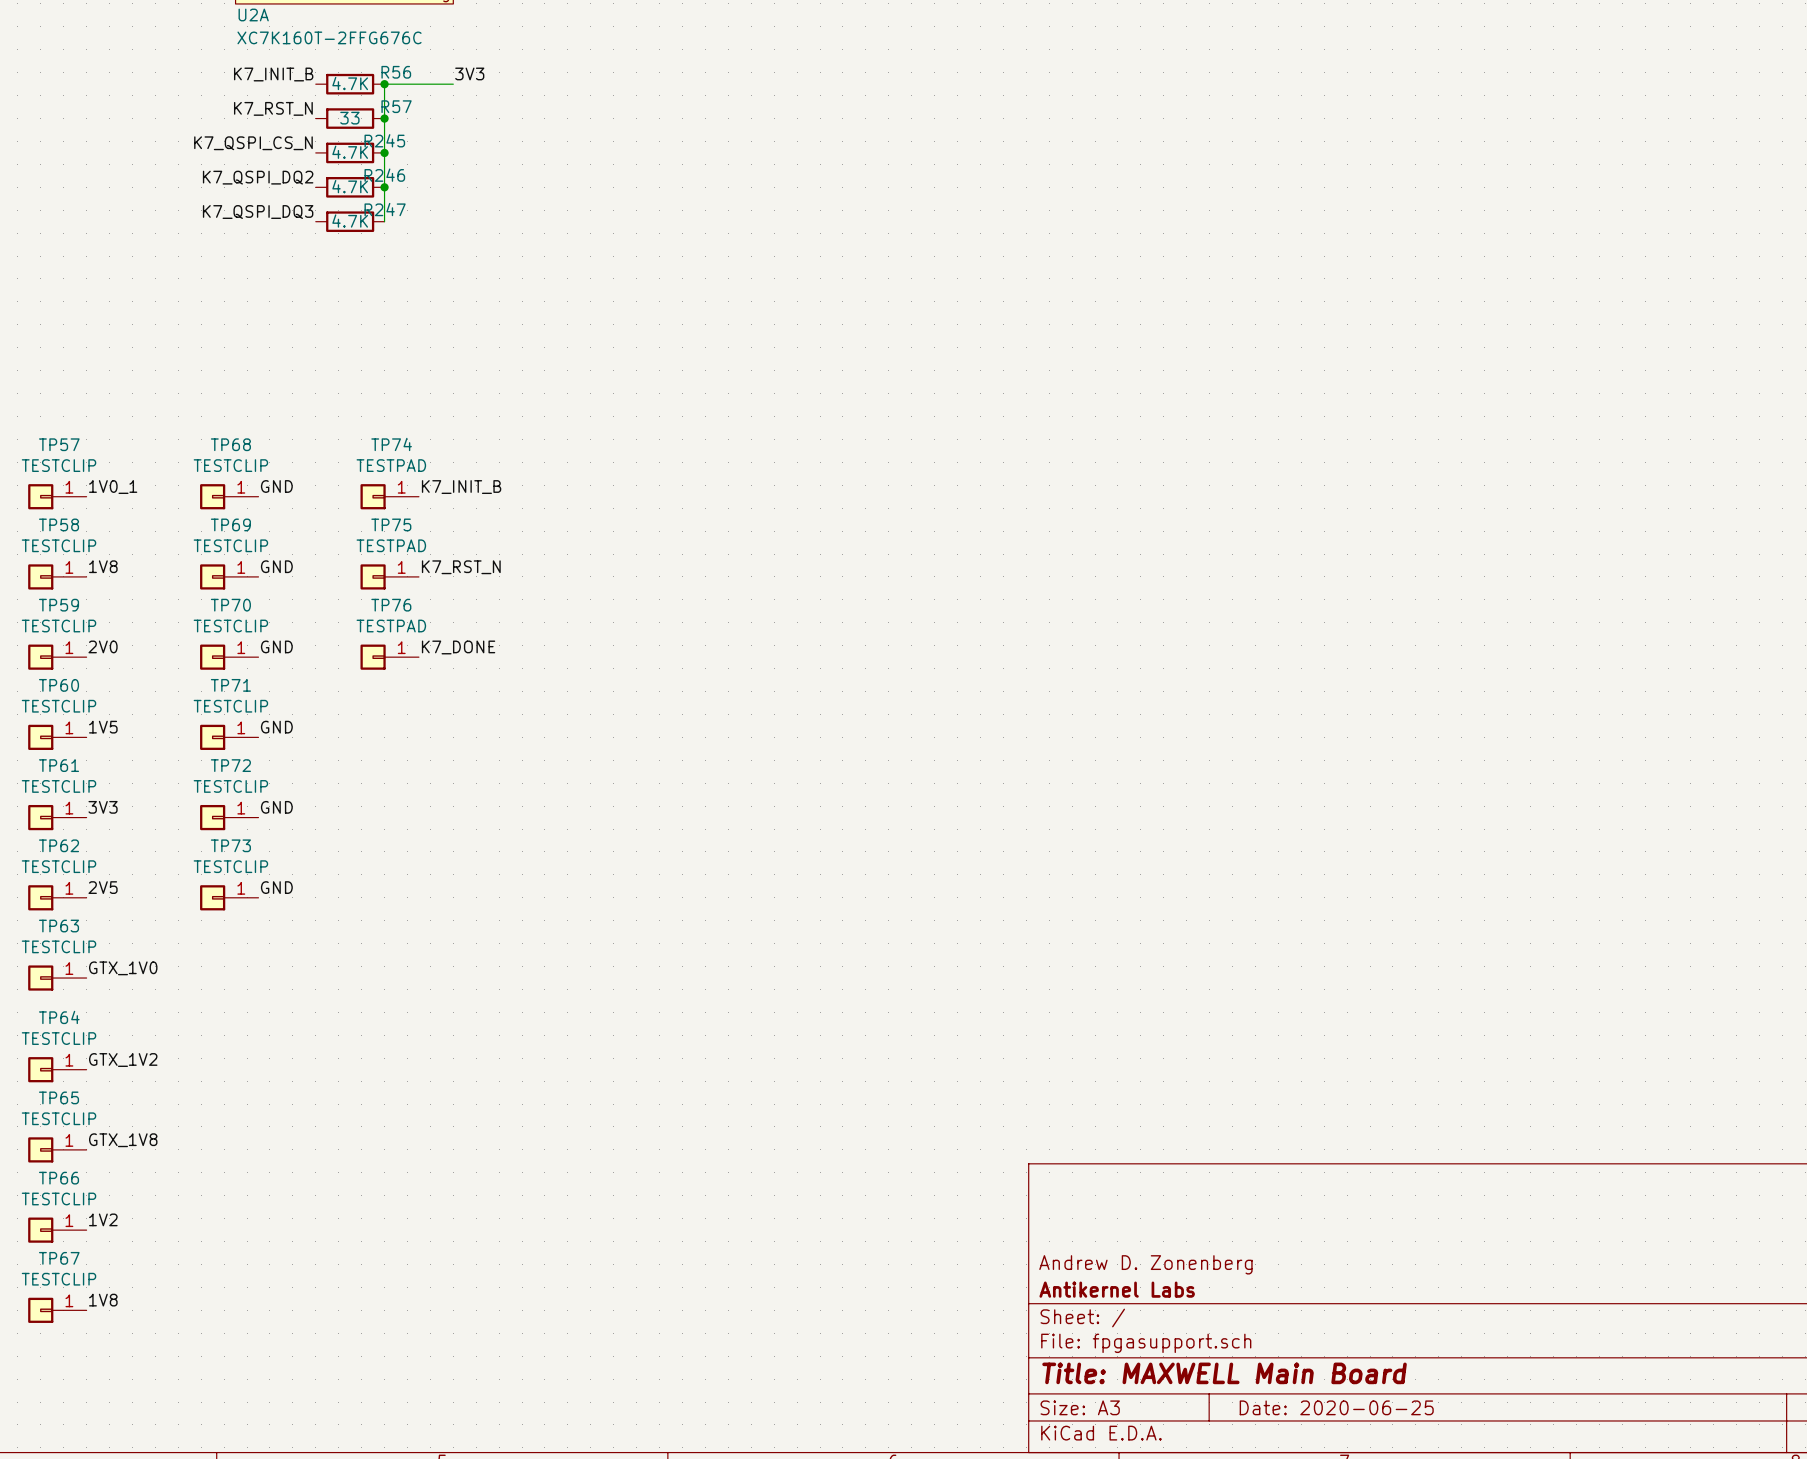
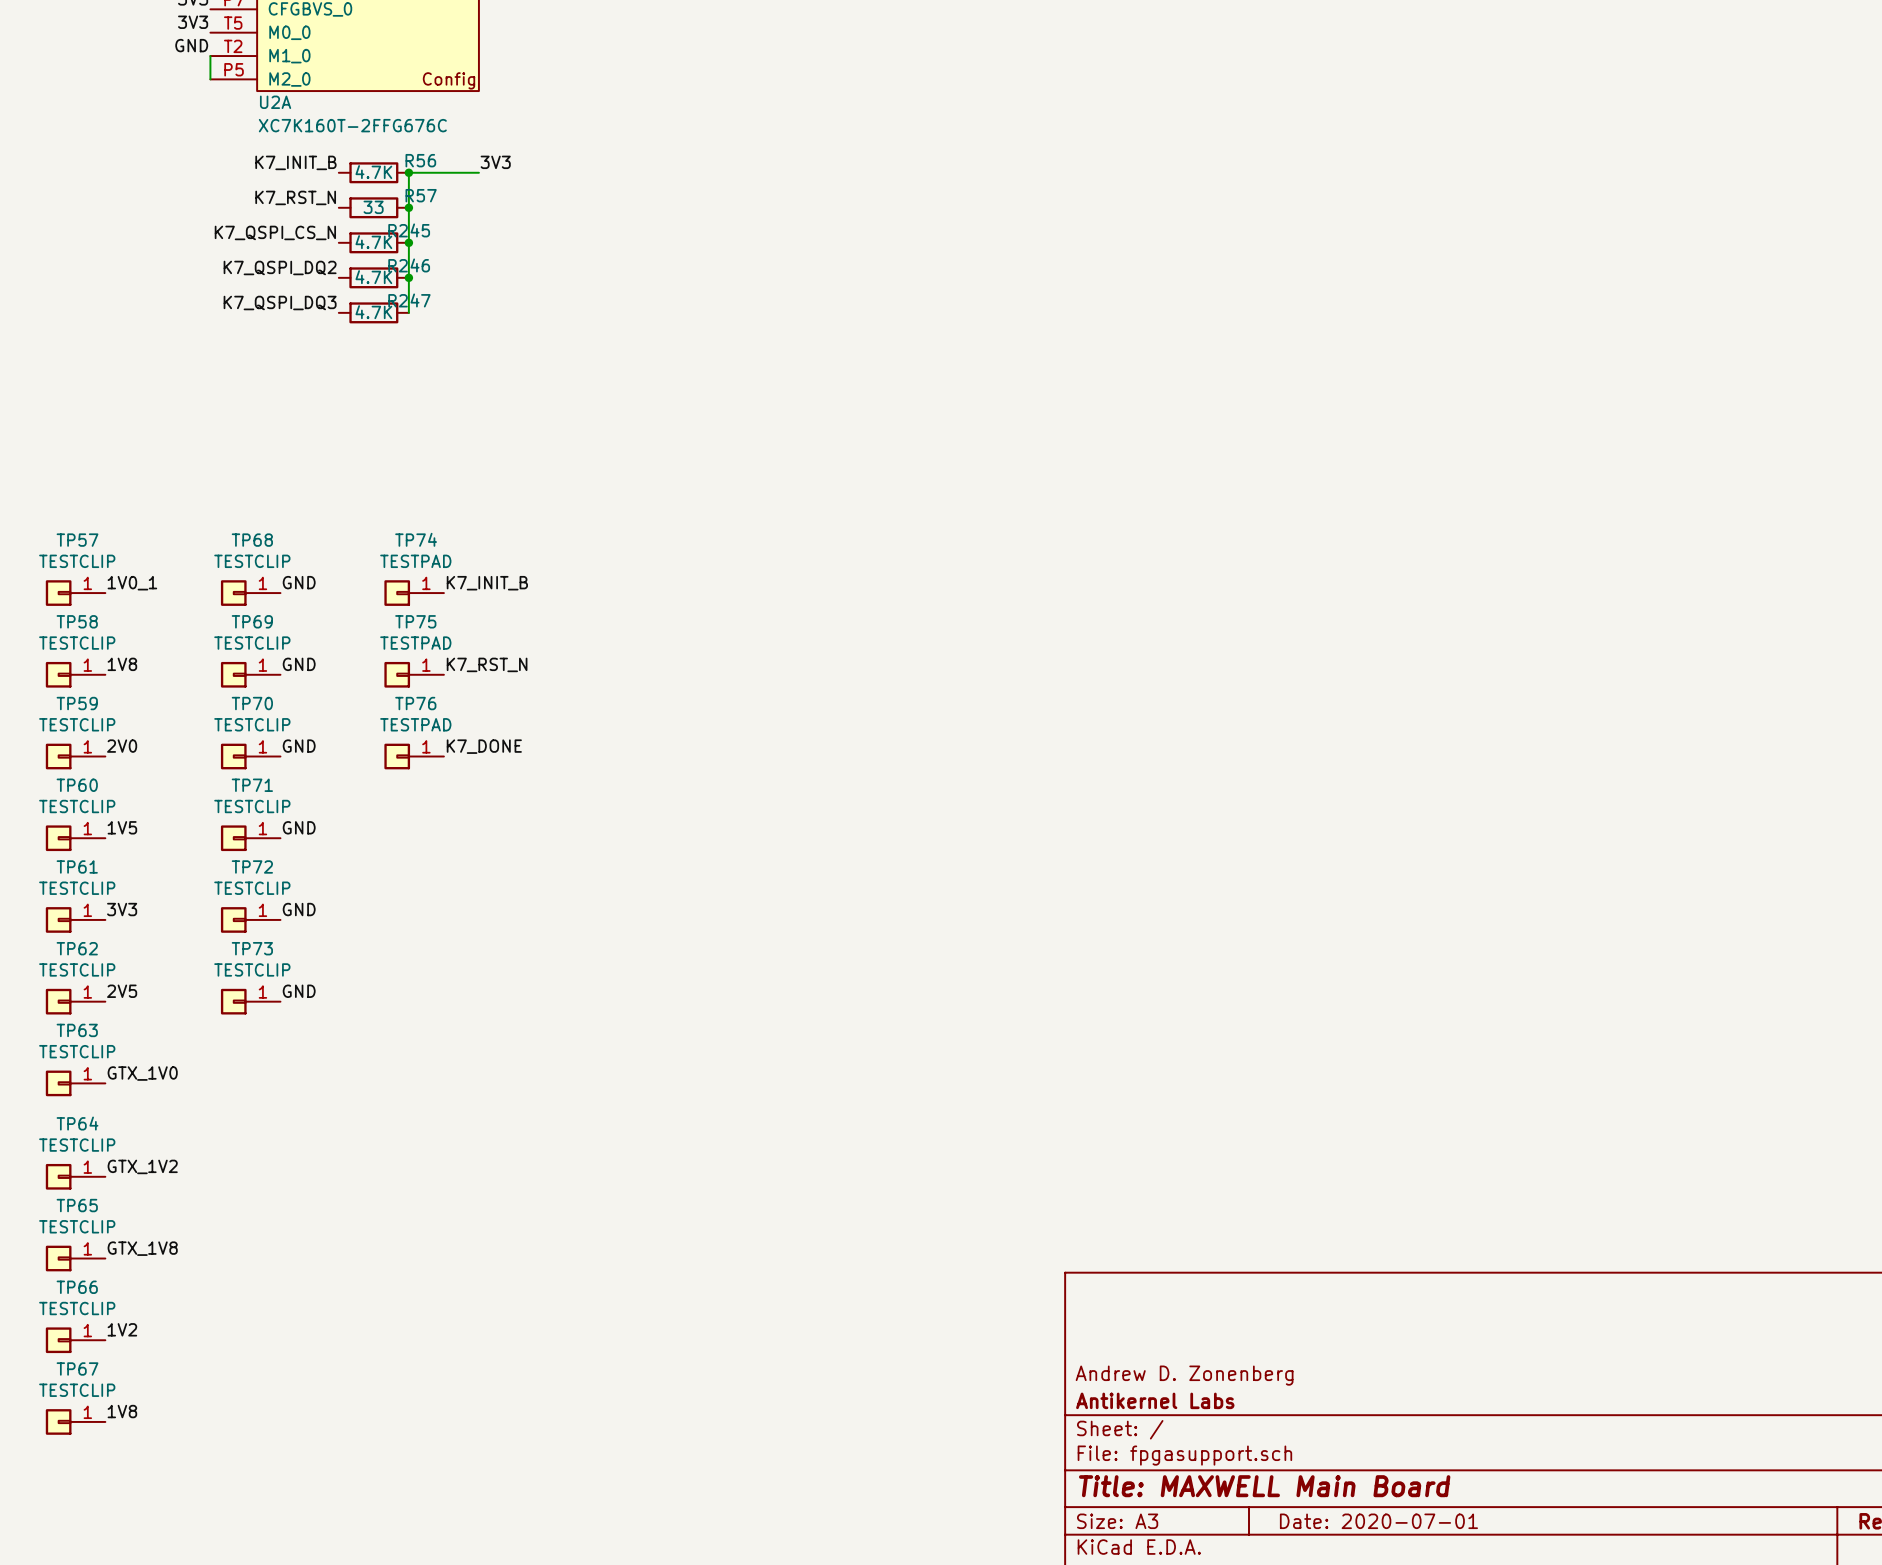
title block: Date: 2020-06-25 (1336, 1407) -> Date: 2020-07-01 (1378, 1521)

